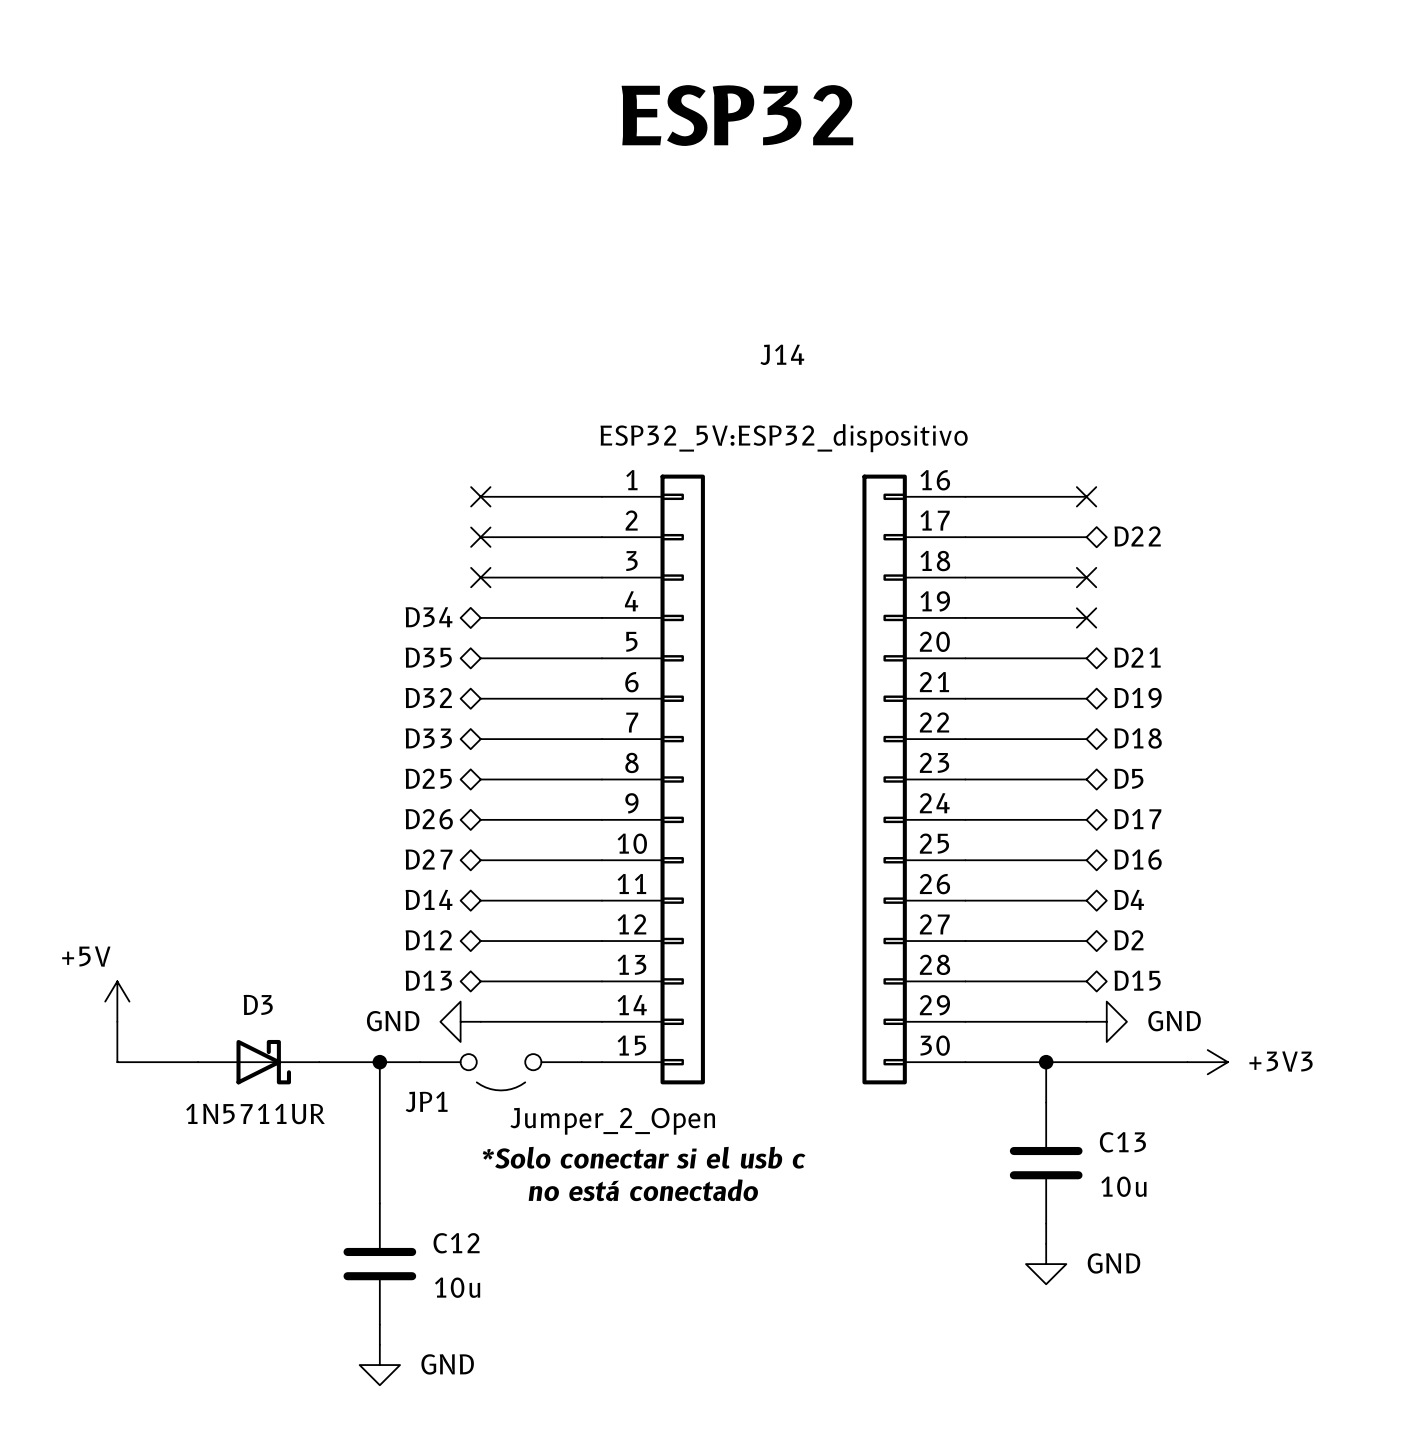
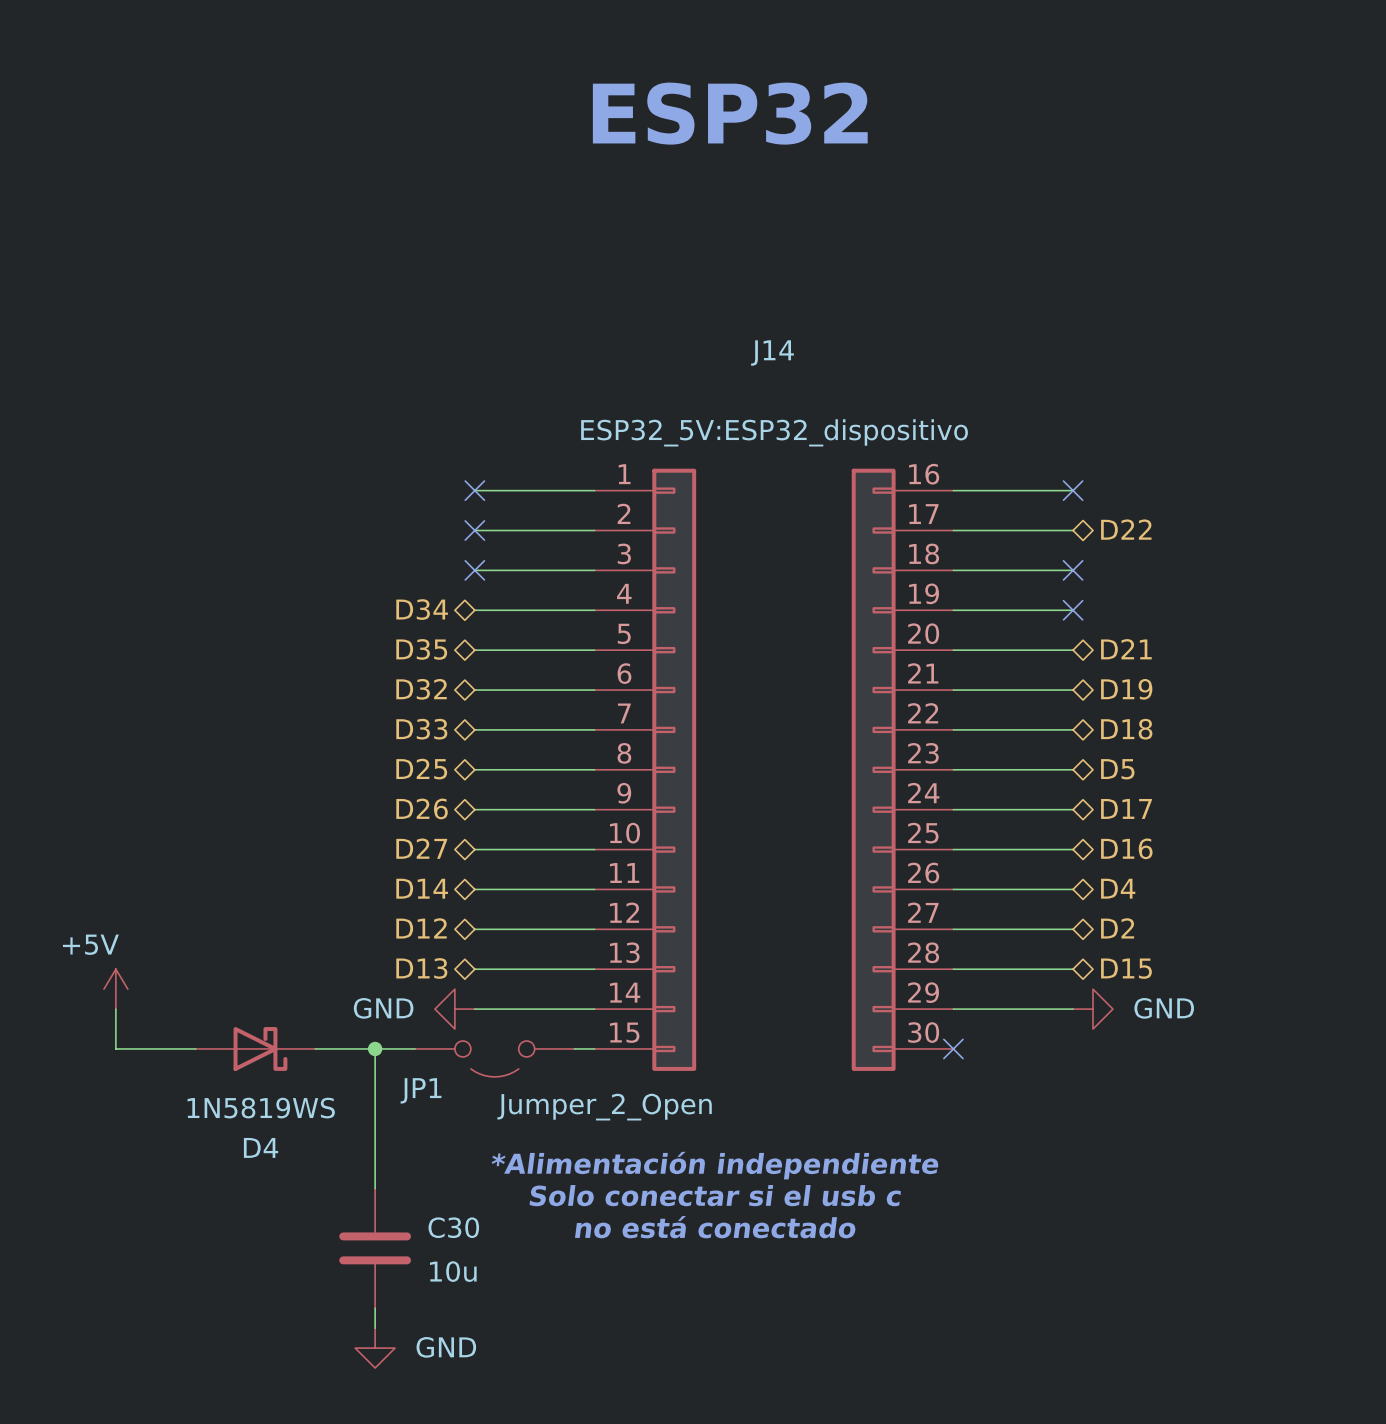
D3 name: D3 (258, 1004) -> D4 (261, 1147)
wire: (965, 1062) (1187, 1062) -> none
no-connect mark: none -> (953, 1048)
wire: (1046, 1062) (1046, 1102) -> none
junction: (1046, 1062) -> none
power symbol: +3V3 (1207, 1062) -> none
D3 value: 1N5711UR (255, 1114) -> 1N5819WS (261, 1108)
text: *Solo conectar si el usb c (644, 1157) -> none
C13: 10u (1046, 1163) -> none
text: none -> *Alimentación independiente (715, 1165)
text position: no está conectado (643, 1190) -> no está conectado (715, 1227)
text: none -> Solo conectar si el usb c (715, 1195)
wire: (1046, 1223) (1046, 1243) -> none
C12 name: C12 (456, 1243) -> C30 (453, 1227)
power symbol: GND (1046, 1264) -> none

